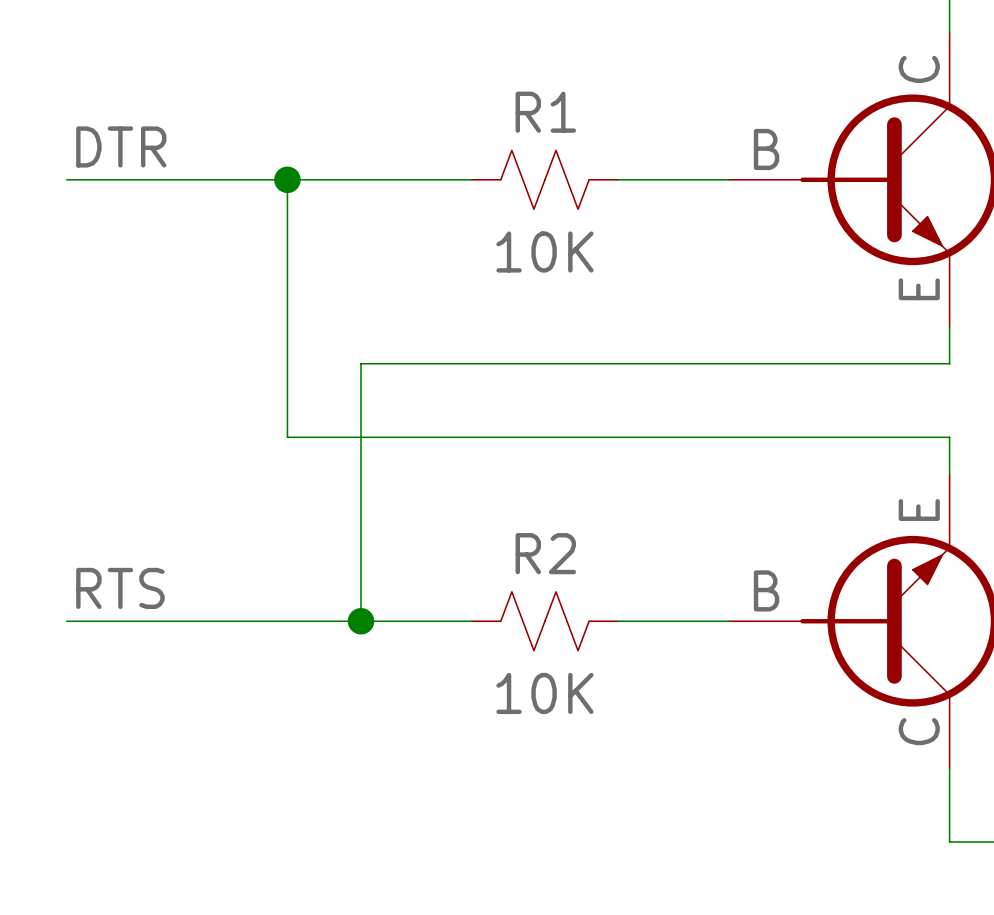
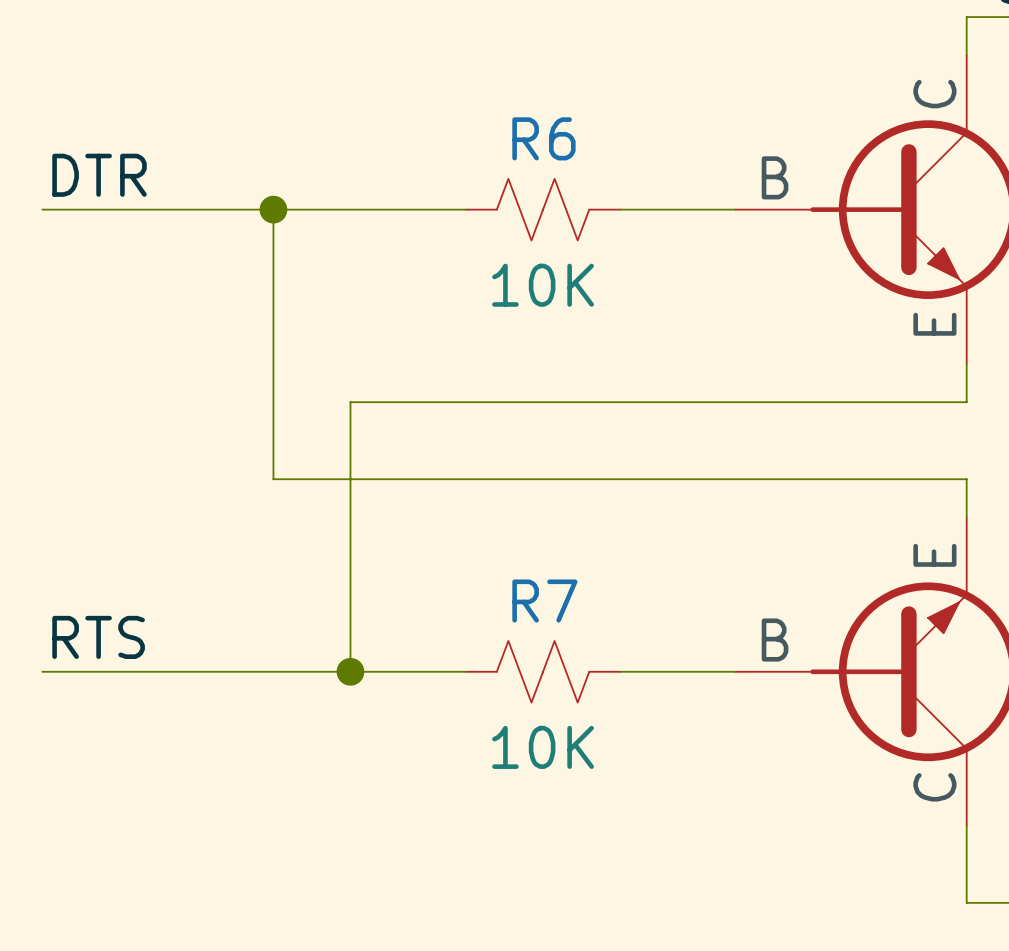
R1 name: R1 (545, 112) -> R6 (543, 138)
R2 name: R2 (545, 553) -> R7 (544, 601)

